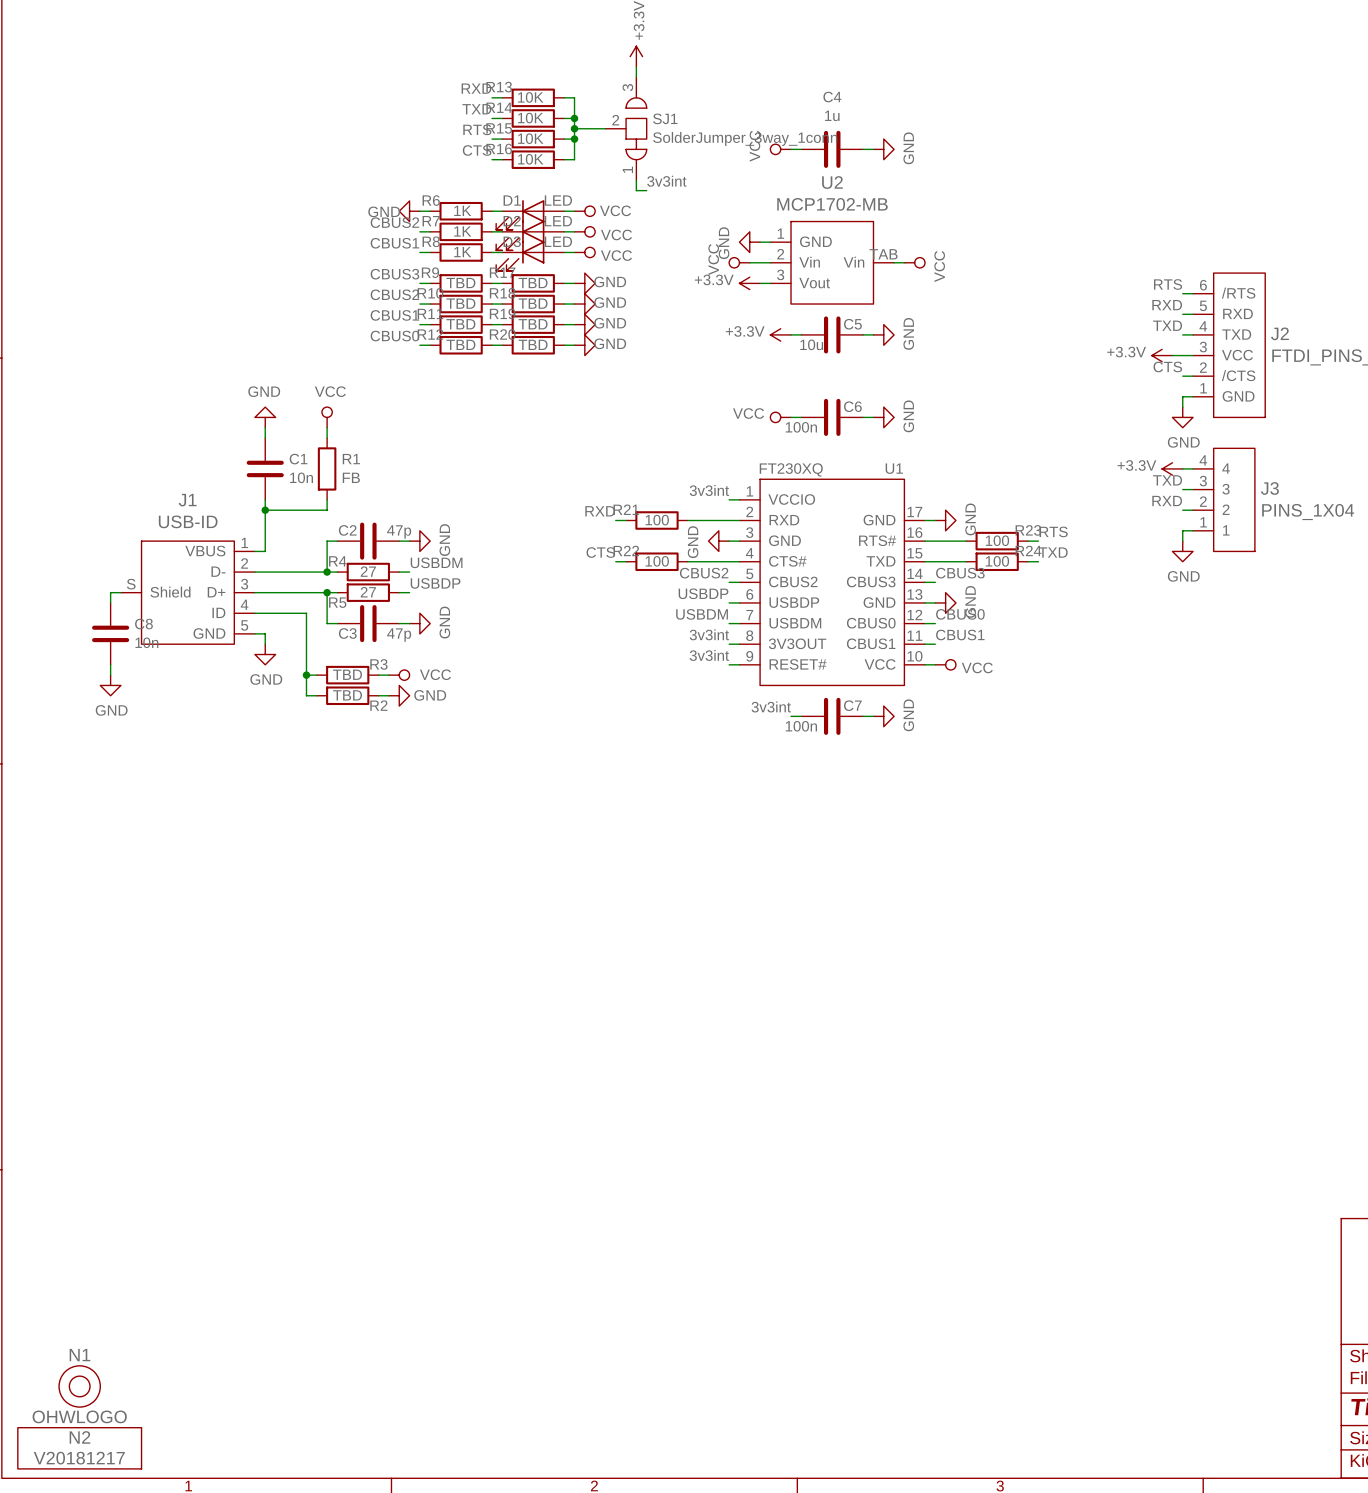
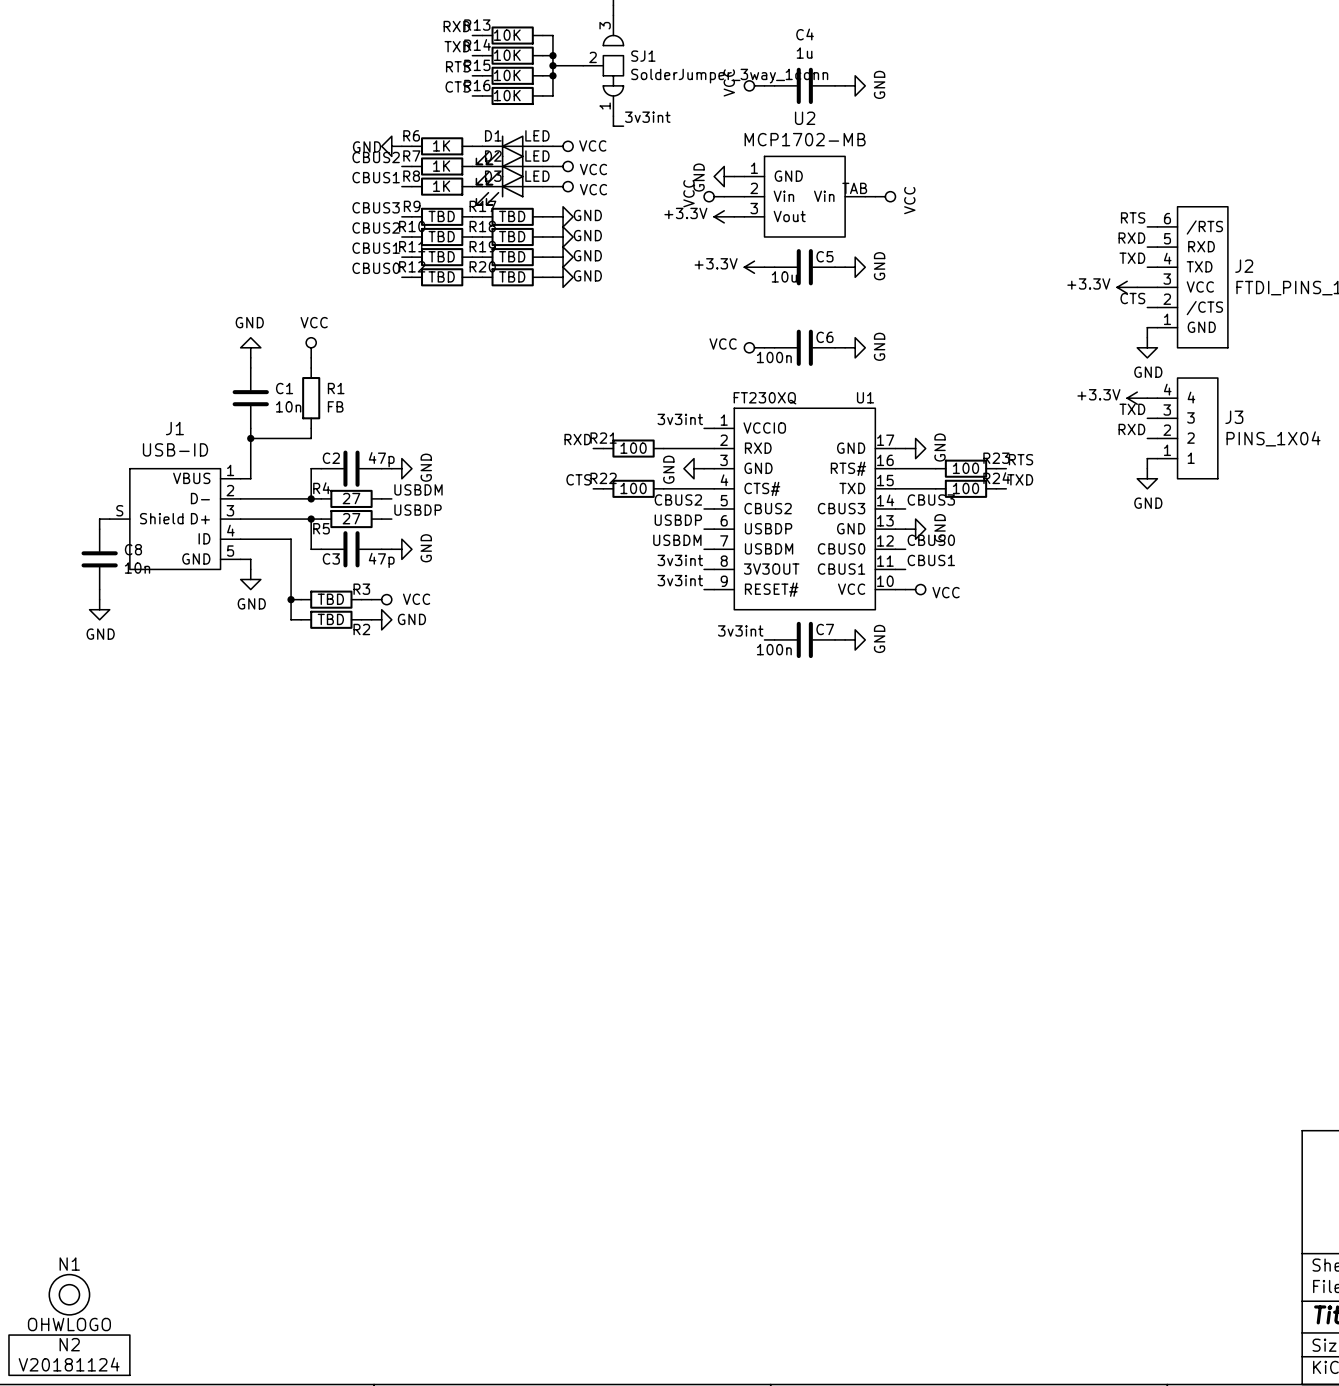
N2 value: V20181217 (79, 1458) -> V20181124 (69, 1364)

